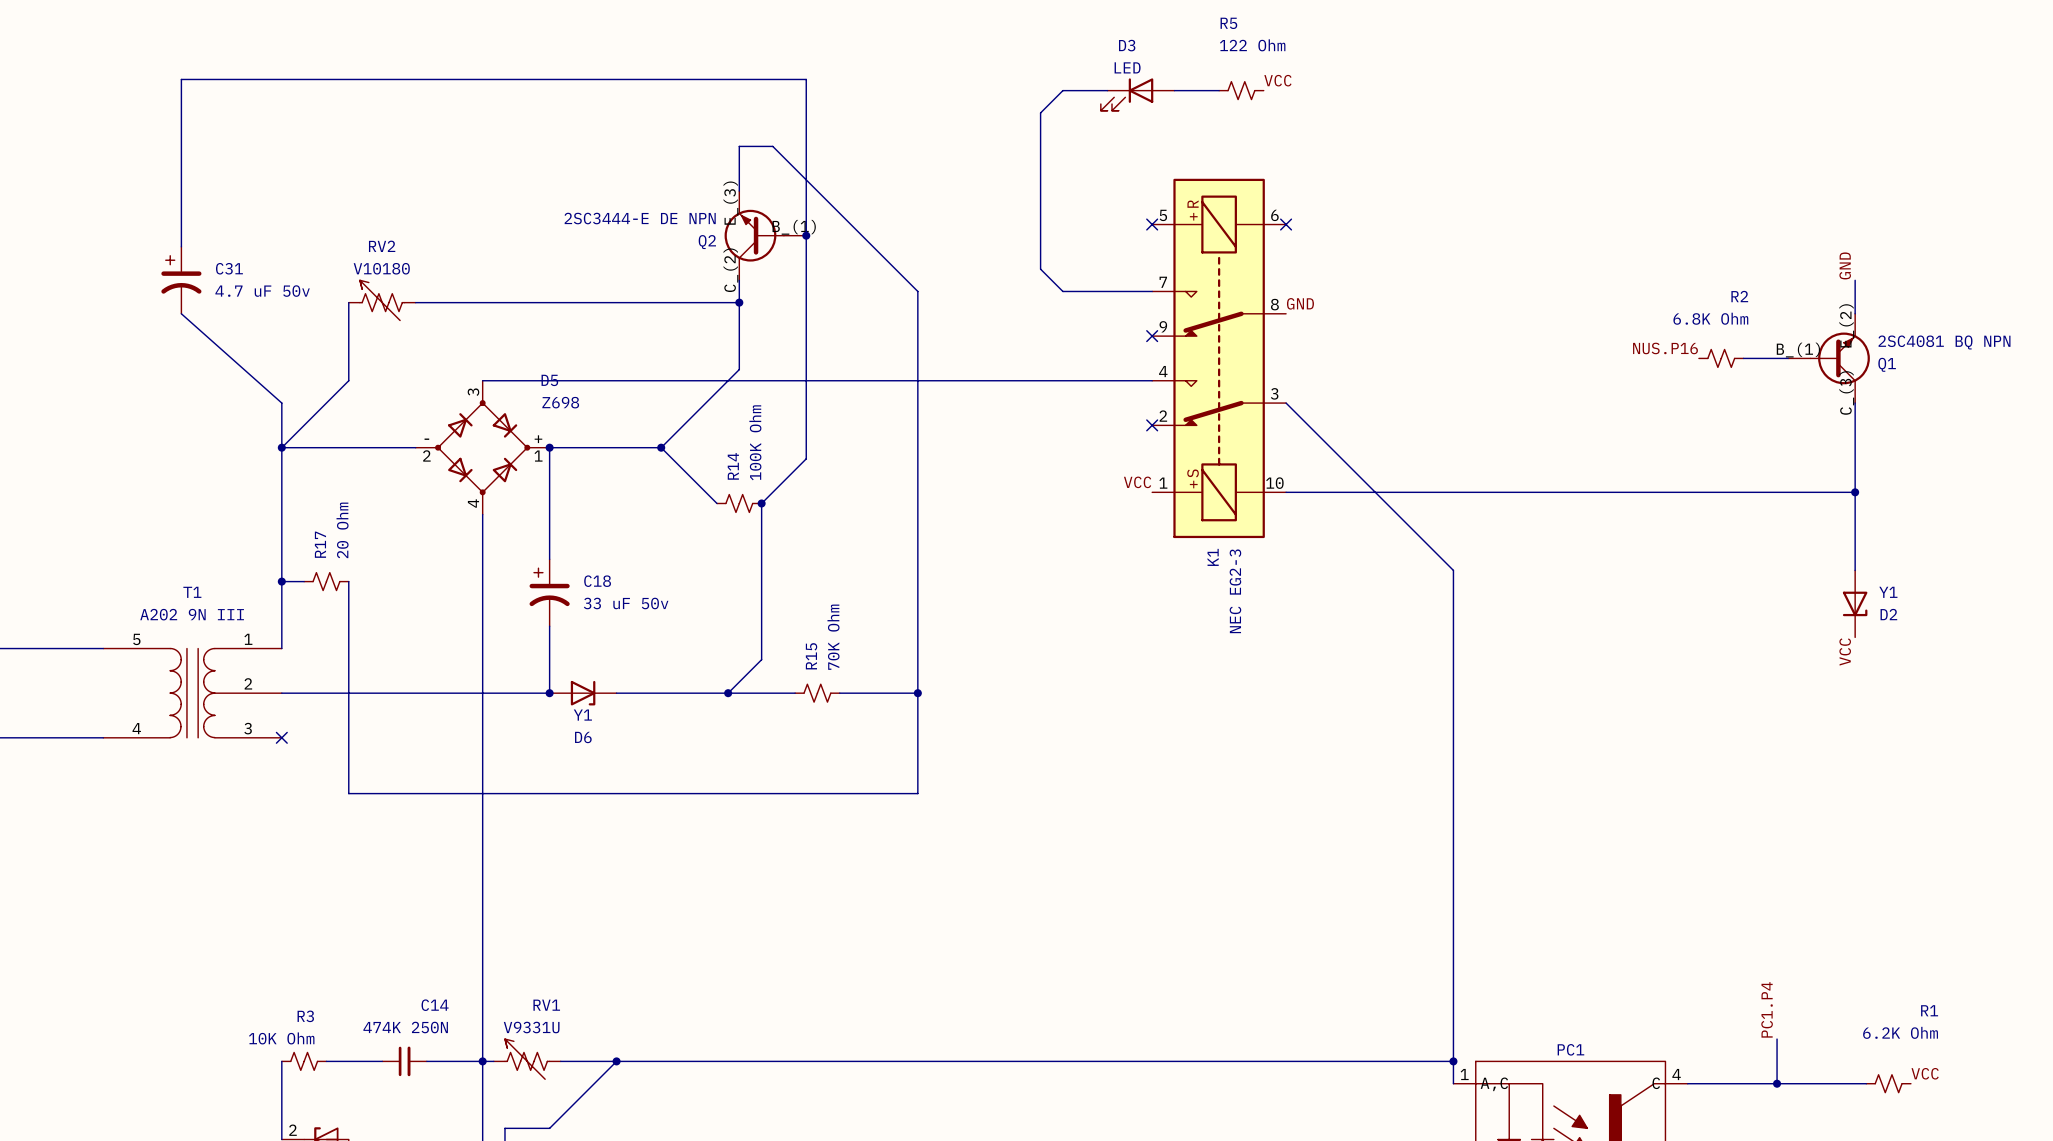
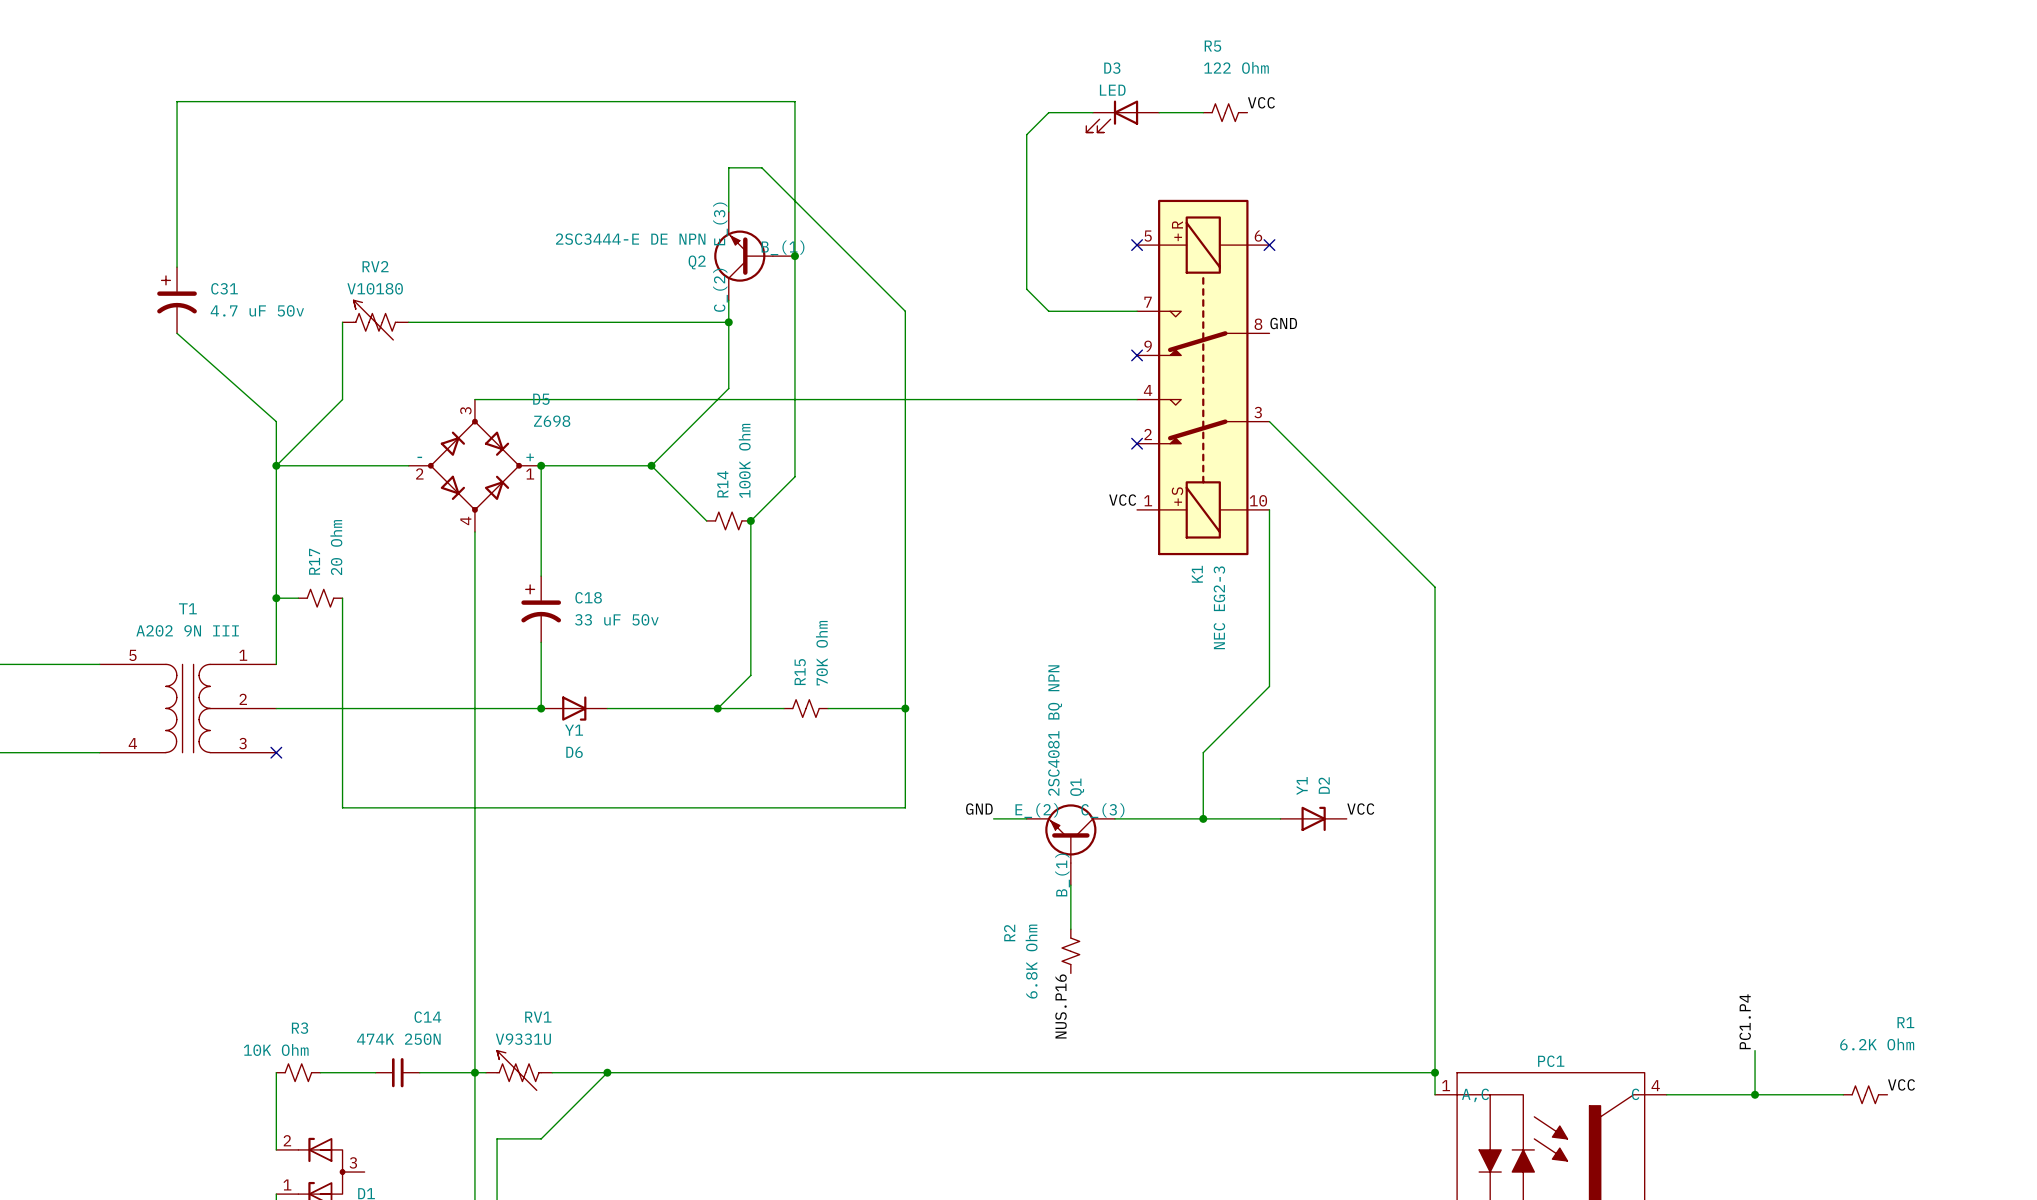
label: GND (1845, 265) -> none
wire: (1855, 280) (1855, 313) -> none
R2 name position: R2 (1739, 296) -> R2 (1009, 933)
R2 value position: 6.8K Ohm (1710, 318) -> 6.8K Ohm (1031, 961)
label: NUS.P16 (1665, 348) -> none
R2 rotation: 0° (1721, 358) -> 90° clockwise (1070, 951)
R2 position: (1721, 358) -> (1070, 951)
wire: (1743, 358) (1788, 358) -> none
Q1 position: (1829, 358) -> (1070, 844)
Q1 rotation: 0° (1839, 358) -> 90° counterclockwise (1070, 834)
wire: (1855, 403) (1855, 570) -> none
wire: (1286, 492) (1855, 492) -> (1269, 509) (1269, 686) (1203, 752) (1203, 818)
junction: (1855, 492) -> none
D2 rotation: 0° (1855, 603) -> 90° counterclockwise (1313, 818)
D2 position: (1855, 603) -> (1313, 818)
label: VCC (1845, 651) -> none
label: none -> GND (979, 809)
label: none -> VCC (1360, 809)
wire: none -> (993, 818) (1026, 818)
wire: none -> (1114, 818) (1280, 818)
junction: none -> (1203, 818)
wire: none -> (1070, 885) (1070, 929)
label: none -> NUS.P16 (1061, 1006)

